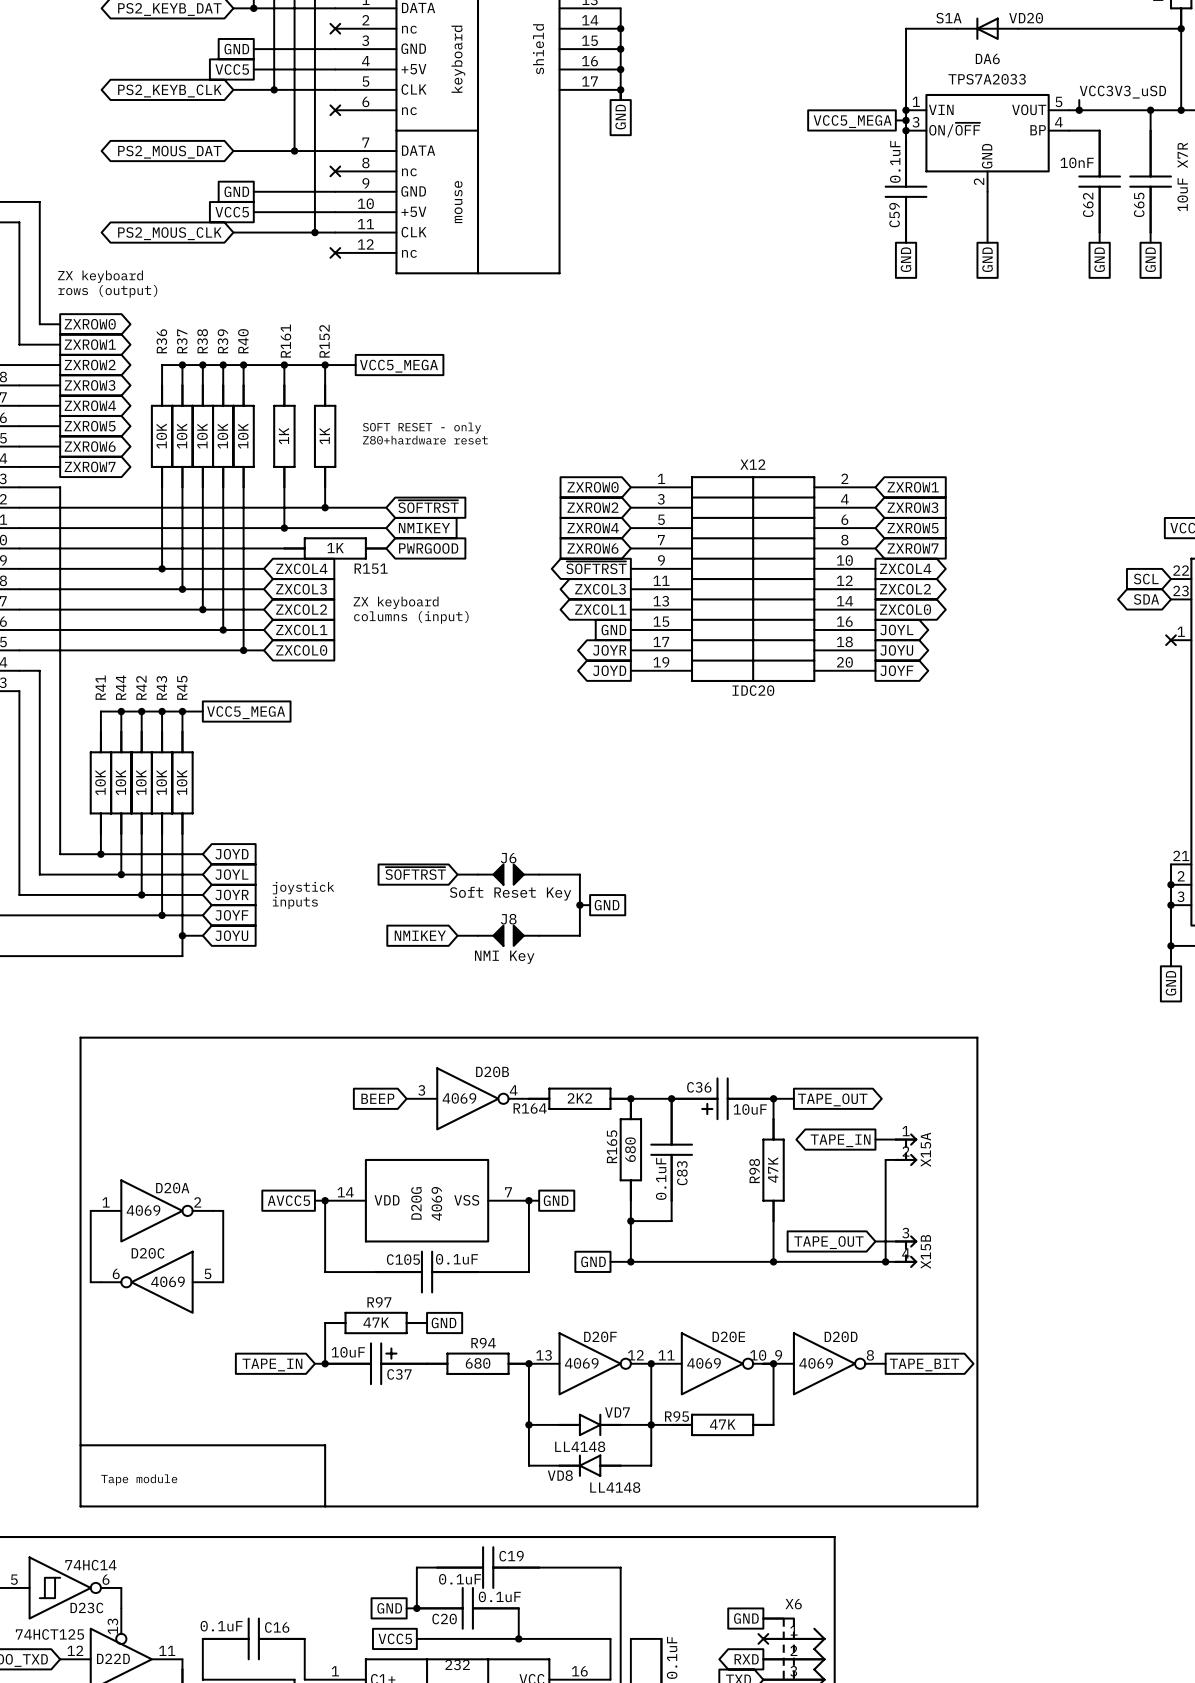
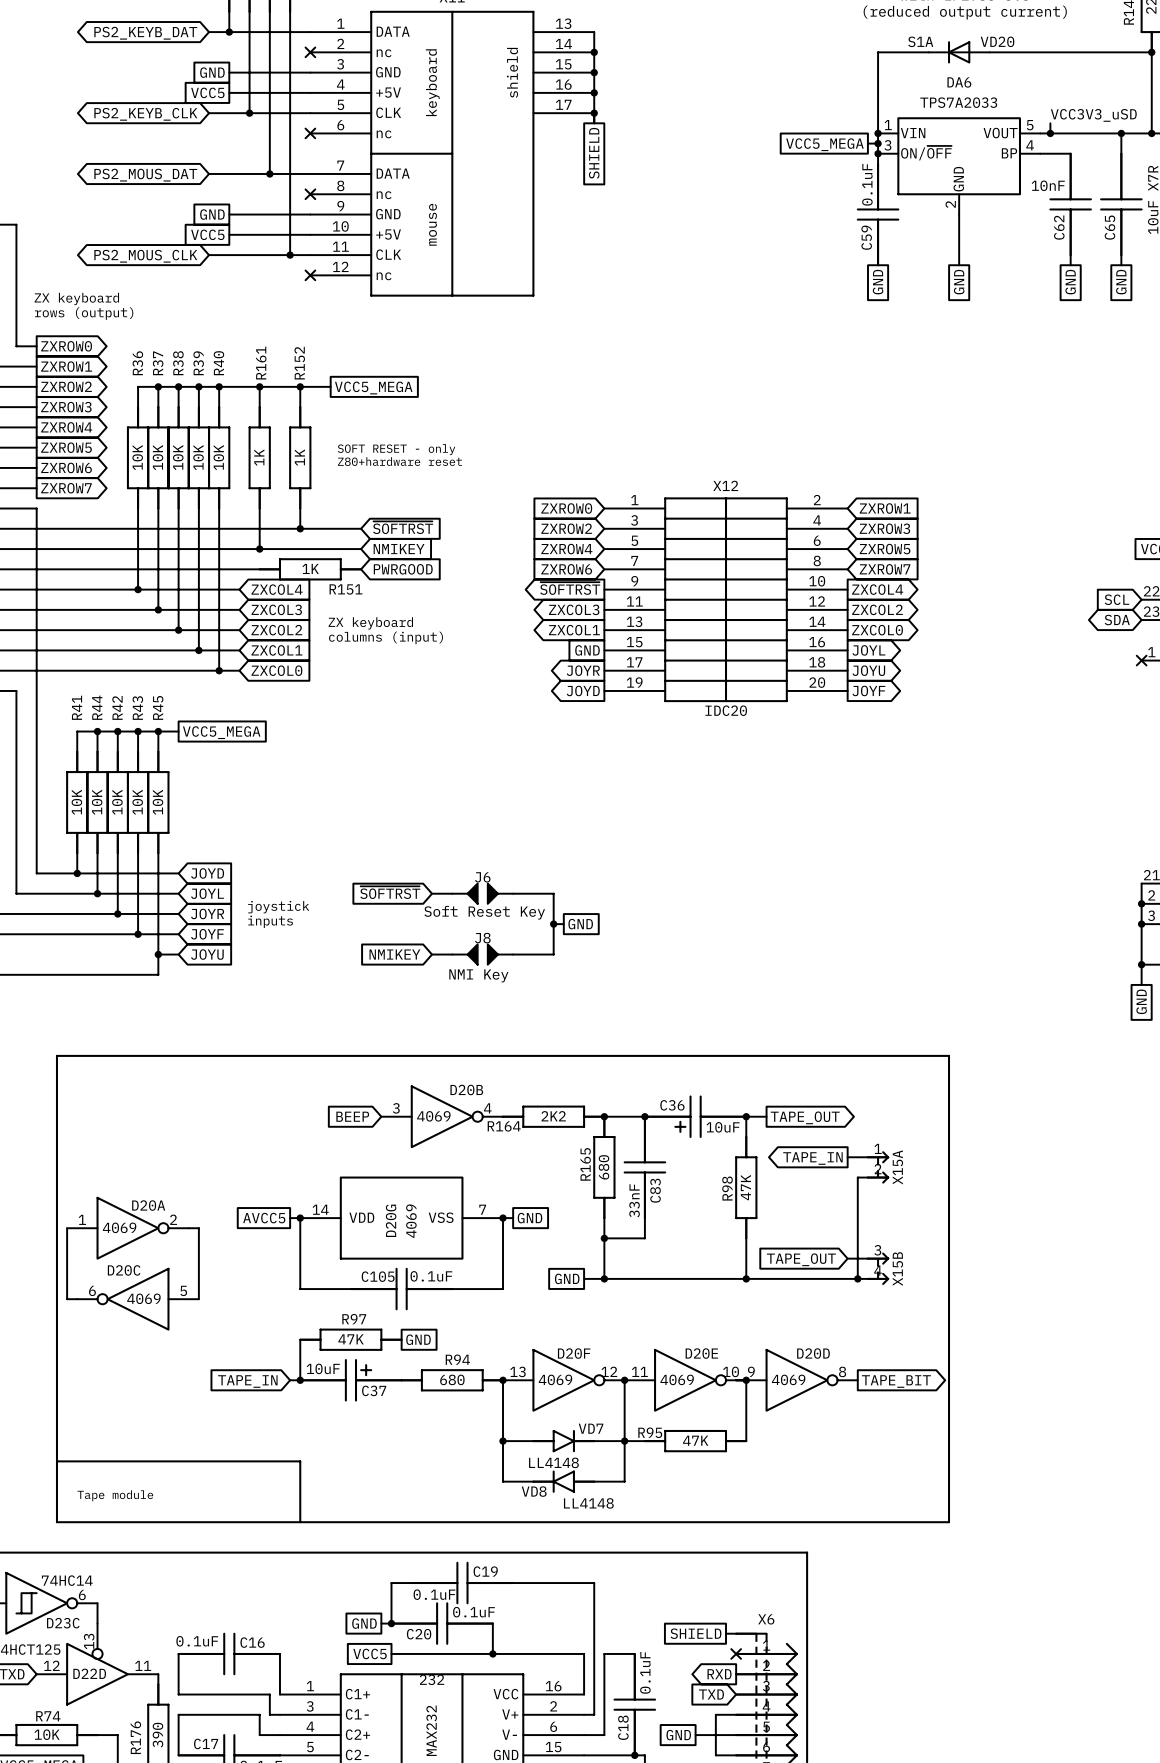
global label: GND (620, 117) -> SHIELD (594, 153)
C83 value: 0.1uF (661, 1178) -> 33nF (634, 1200)
global label: none -> SHIELD (695, 1633)
global label: GND (746, 1618) -> none
wire: none -> (726, 1633) (736, 1633)

